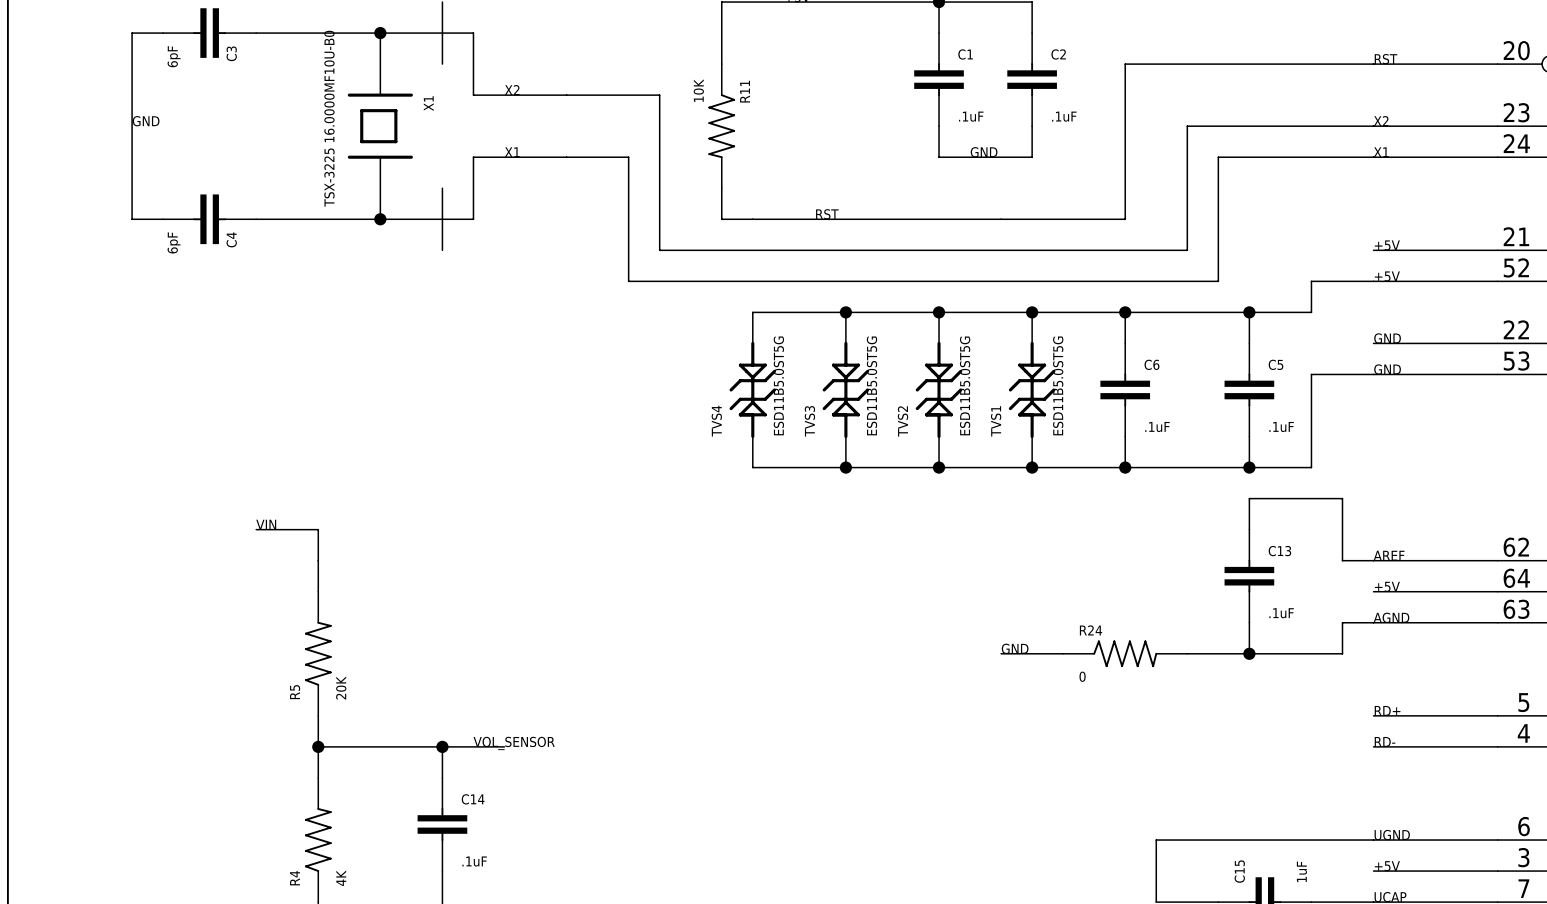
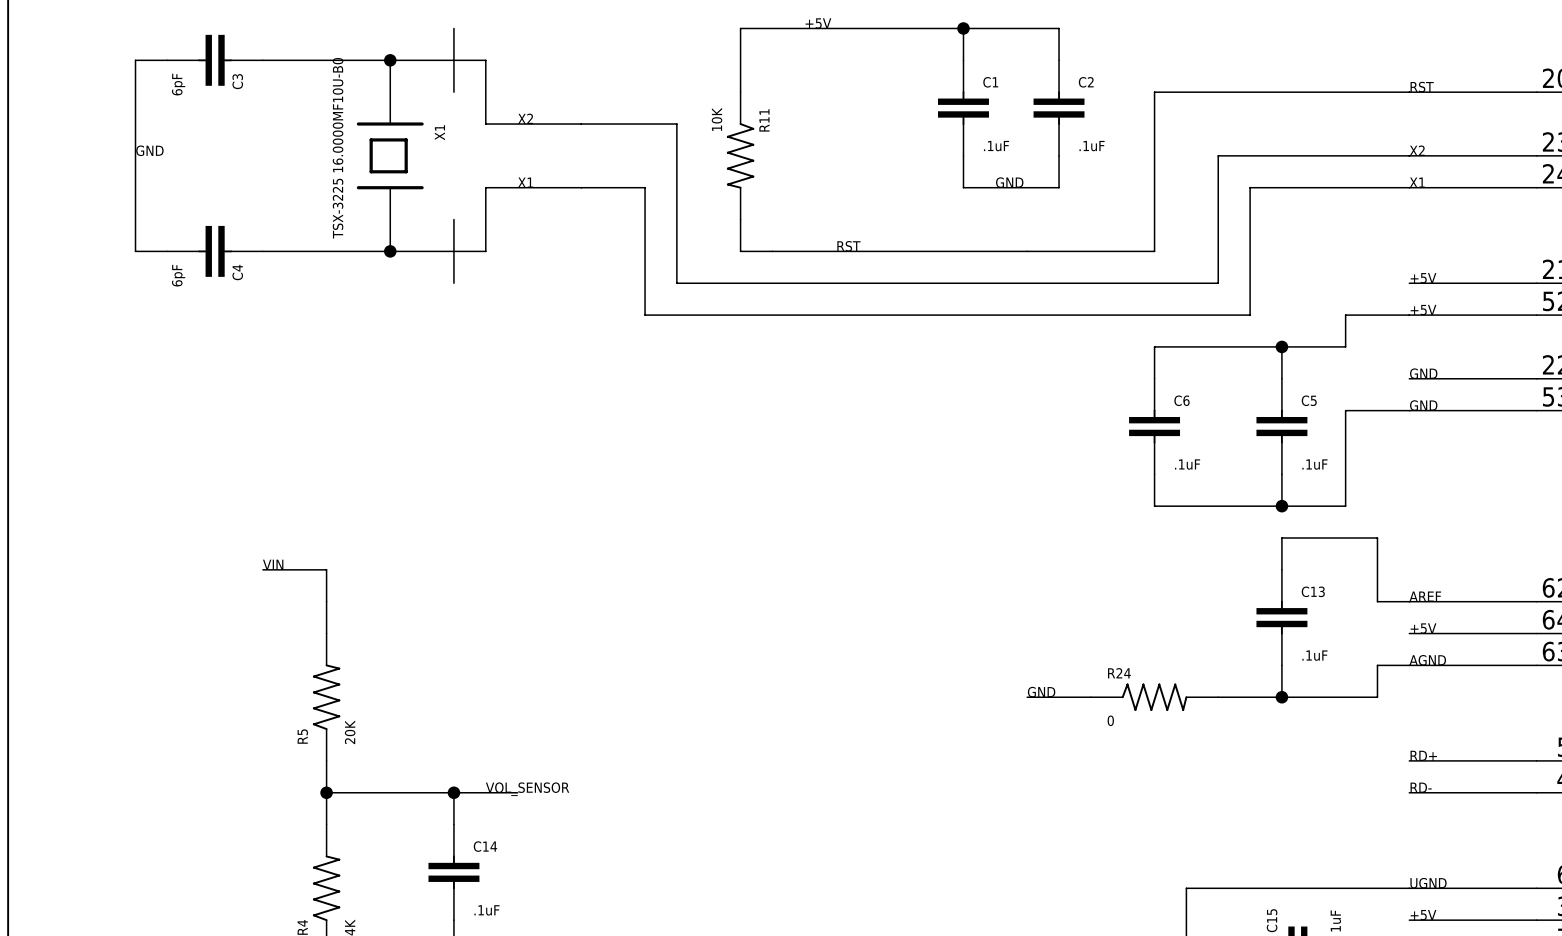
wire: (845, 312) (845, 343) -> none
junction: (845, 312) -> none
wire: (939, 312) (939, 343) -> none
junction: (939, 312) -> none
wire: (1032, 312) (1032, 343) -> none
junction: (1032, 312) -> none
wire: (1125, 312) (752, 312) (752, 343) -> none
junction: (1125, 312) -> none
TVS4: ESD11B5.0ST5G (752, 389) -> none
TVS3: ESD11B5.0ST5G (845, 389) -> none
TVS2: ESD11B5.0ST5G (939, 389) -> none
TVS1: ESD11B5.0ST5G (1032, 389) -> none
wire: (752, 436) (752, 467) (1125, 467) -> none
wire: (845, 436) (845, 467) -> none
wire: (939, 436) (939, 467) -> none
wire: (1032, 436) (1032, 467) -> none
junction: (845, 467) -> none
junction: (939, 467) -> none
junction: (1032, 467) -> none
junction: (1125, 467) -> none

